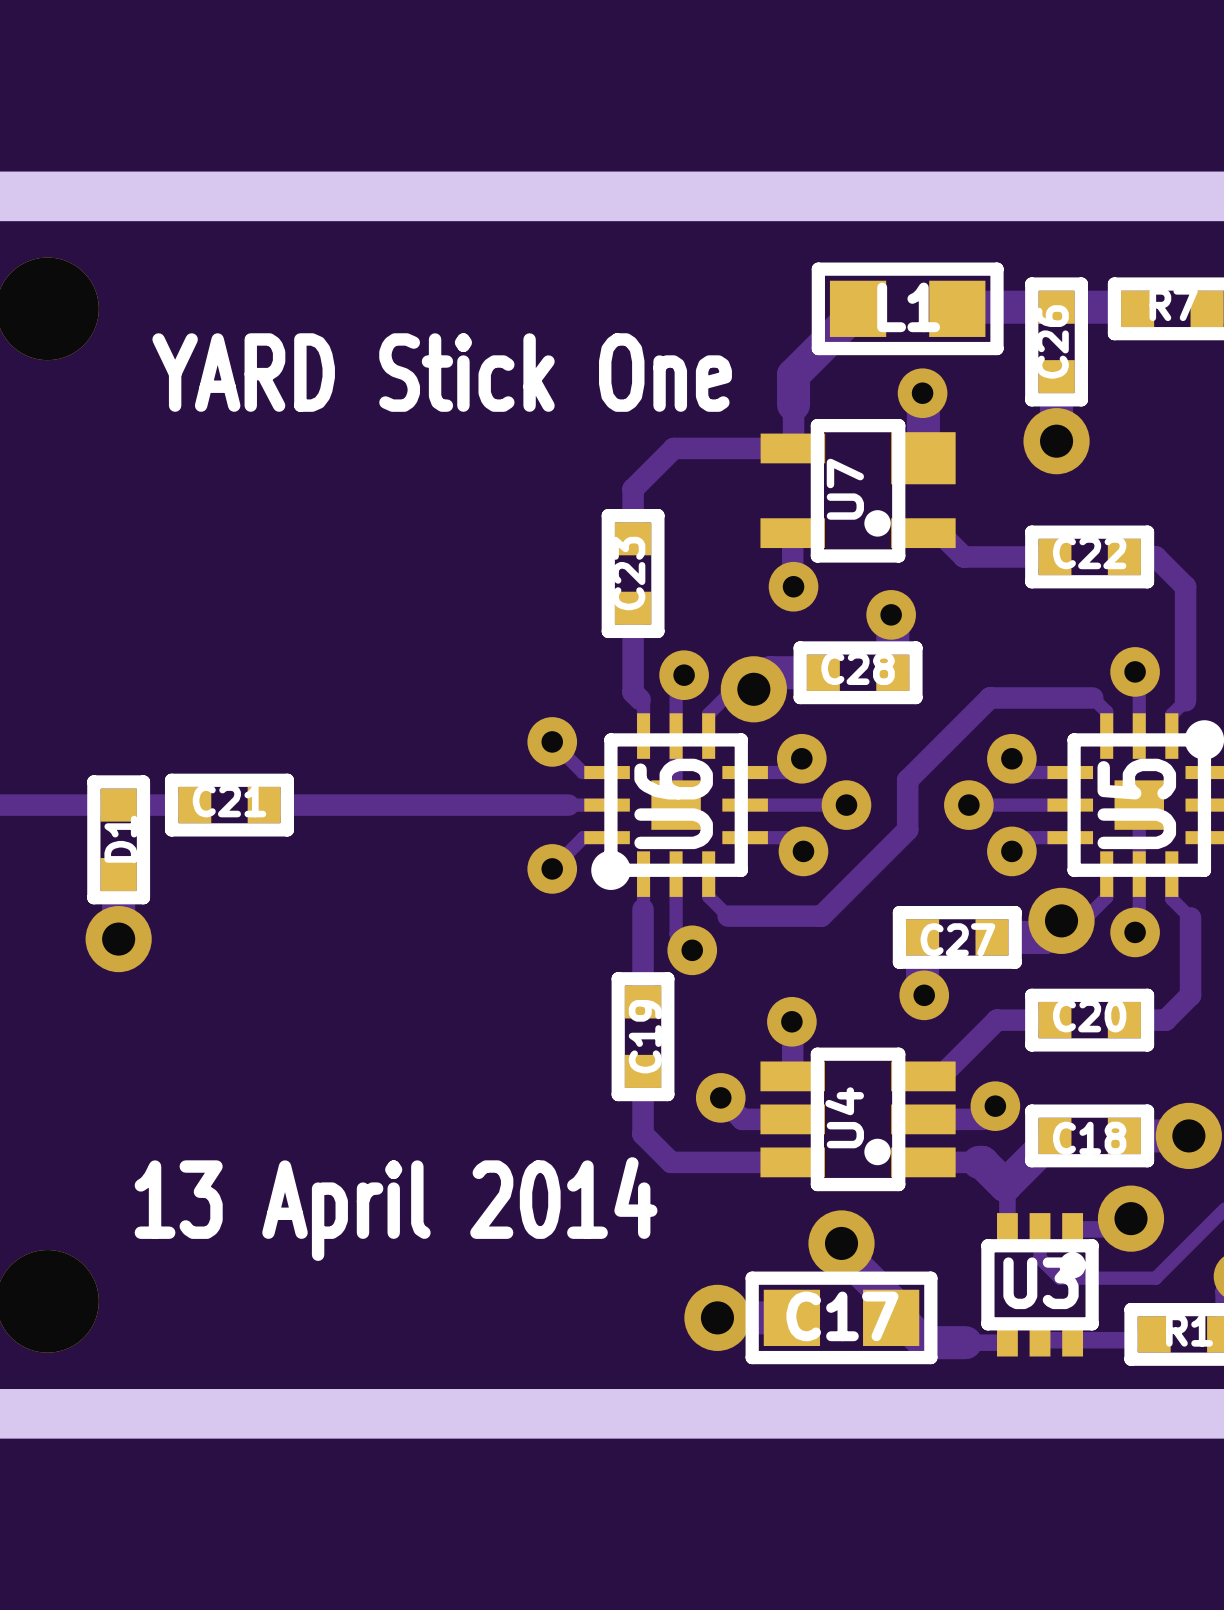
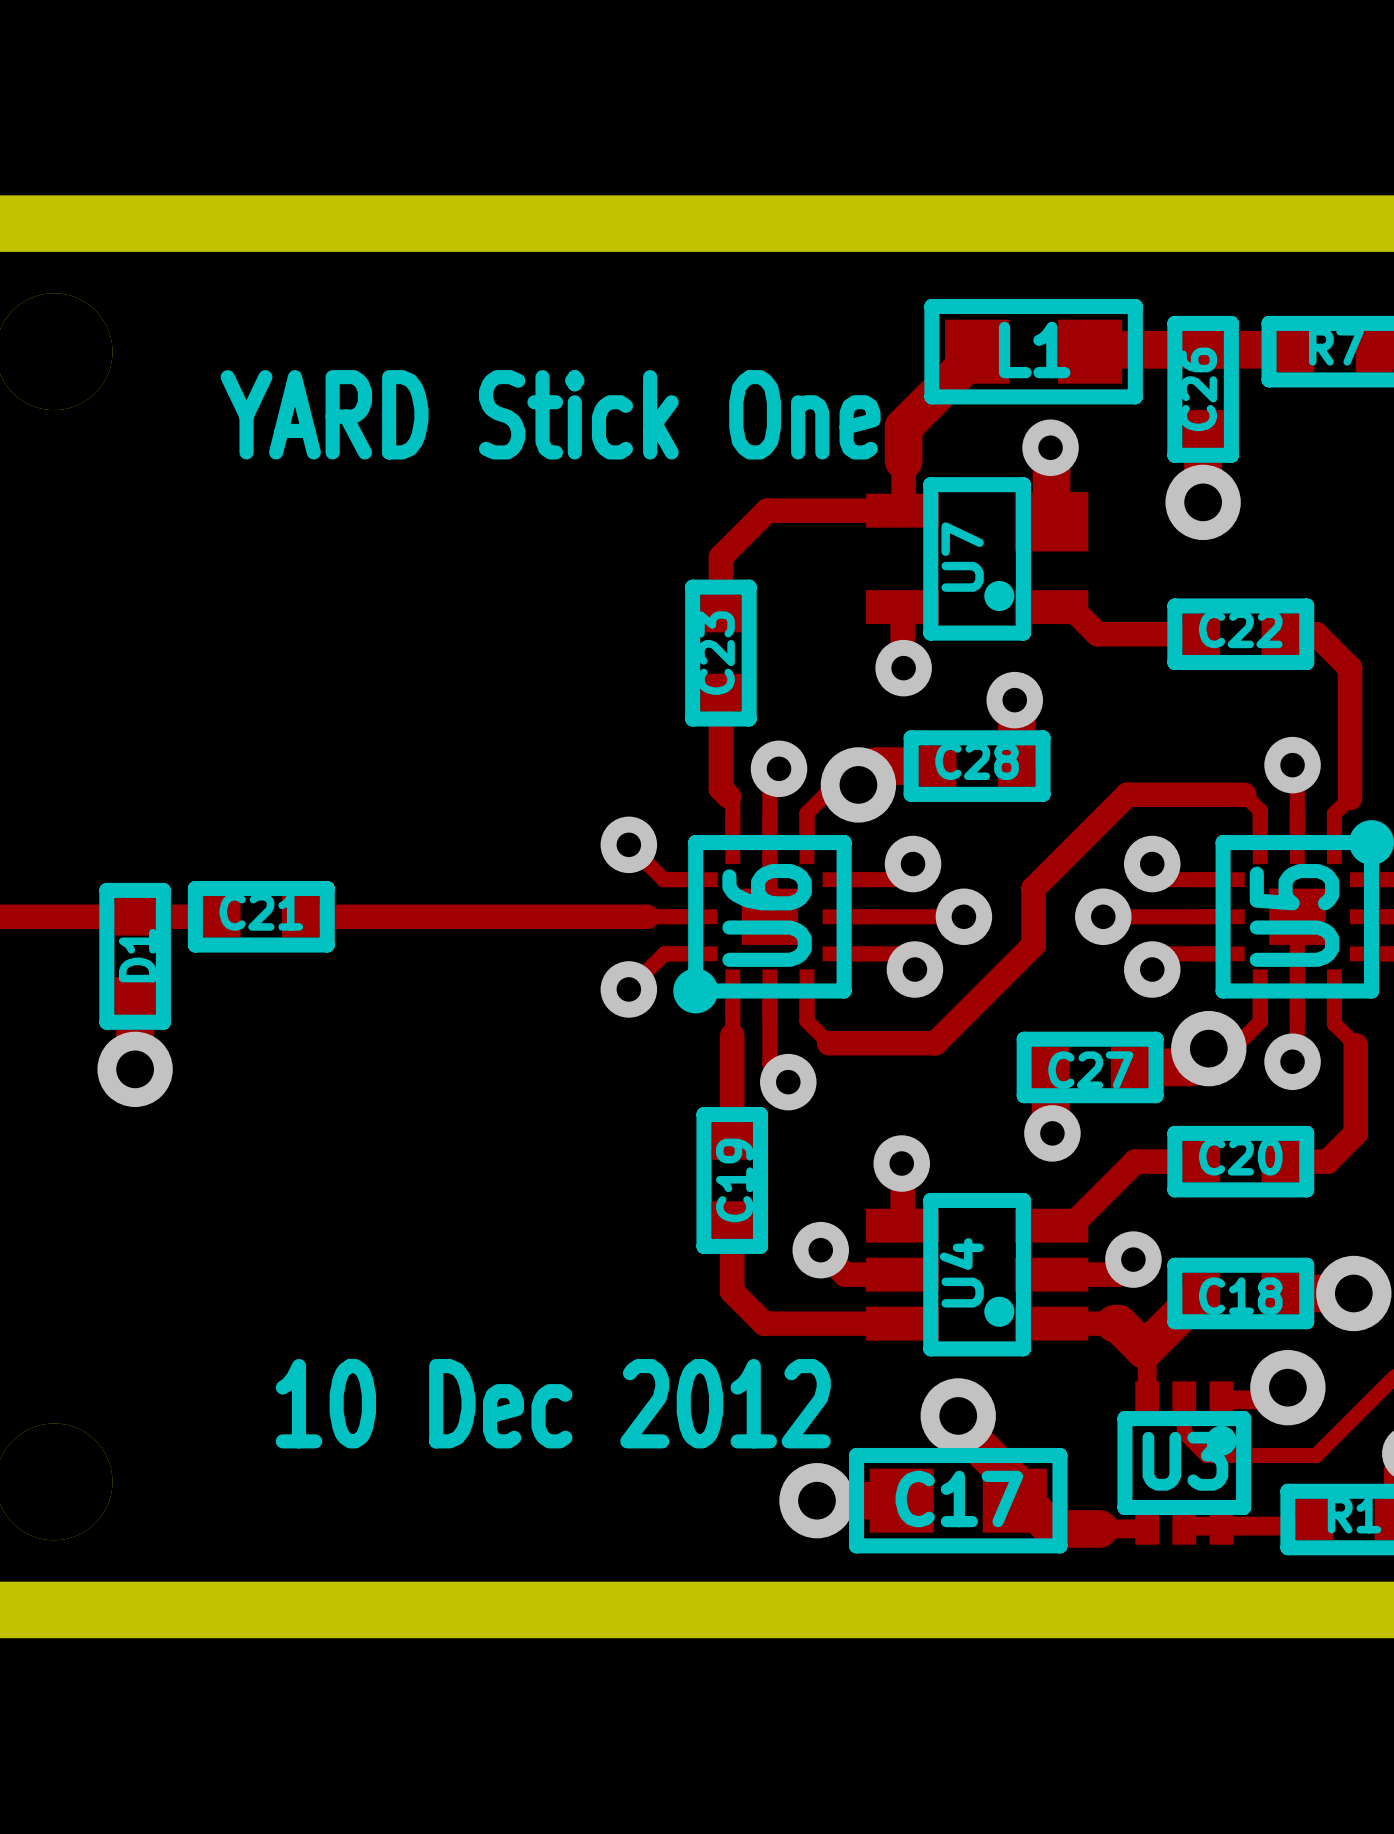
text position: YARD Stick One (442, 372) -> YARD Stick One (550, 414)
text: 13 April 2014 (396, 1209) -> none
text: none -> 10 Dec 2012 (553, 1403)

